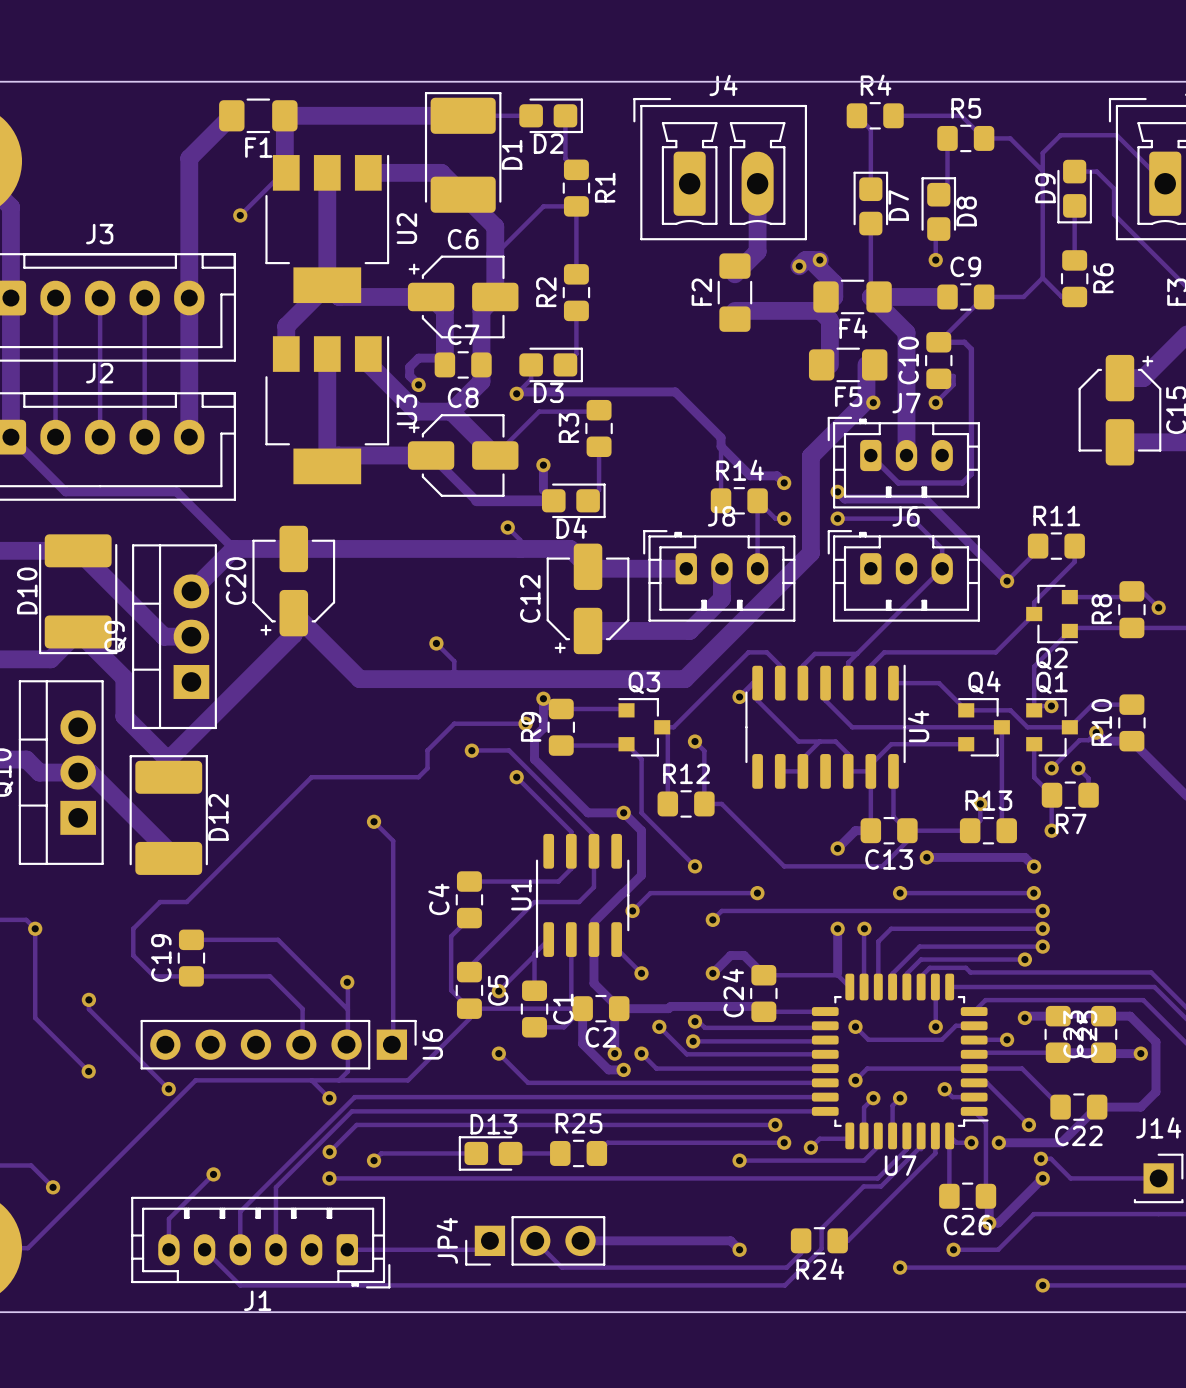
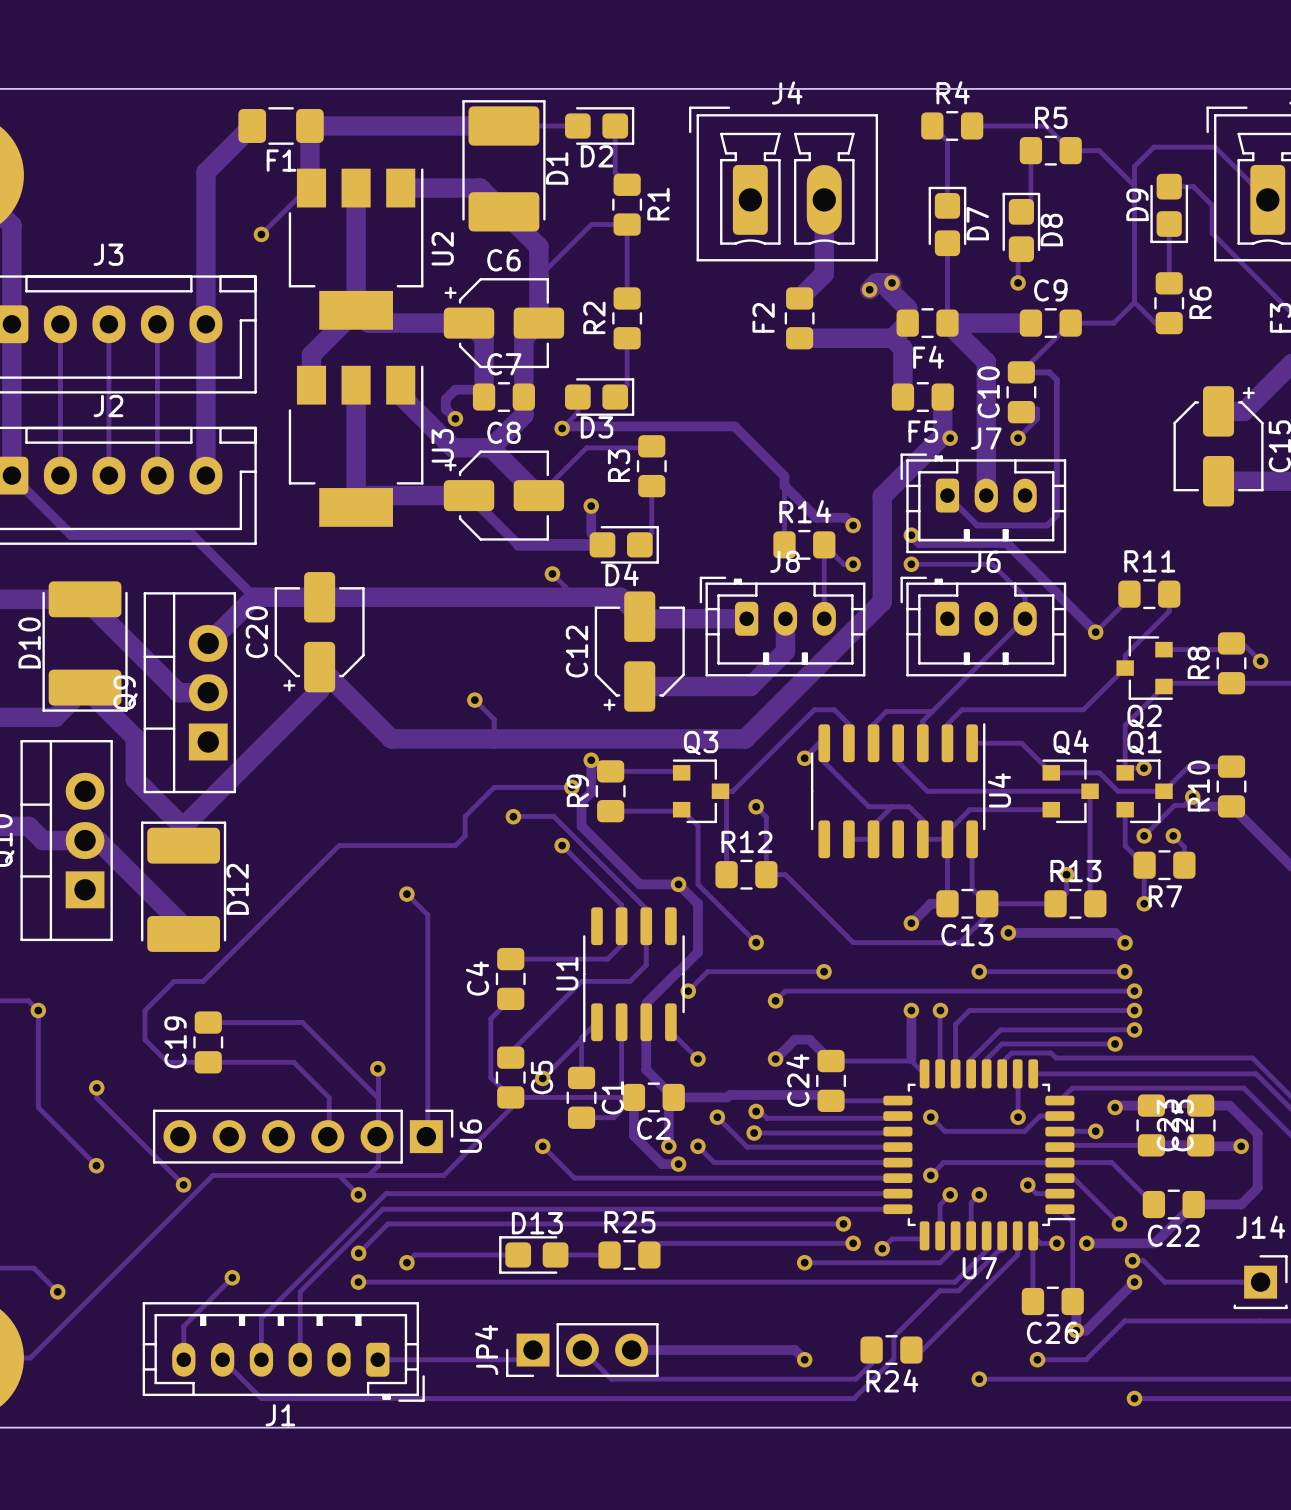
F2 footprint: [717, 253, 753, 332] -> [784, 287, 815, 350]
F4 footprint: [813, 279, 892, 315] -> [896, 308, 959, 339]
F5 footprint: [808, 347, 888, 383] -> [891, 382, 954, 412]

